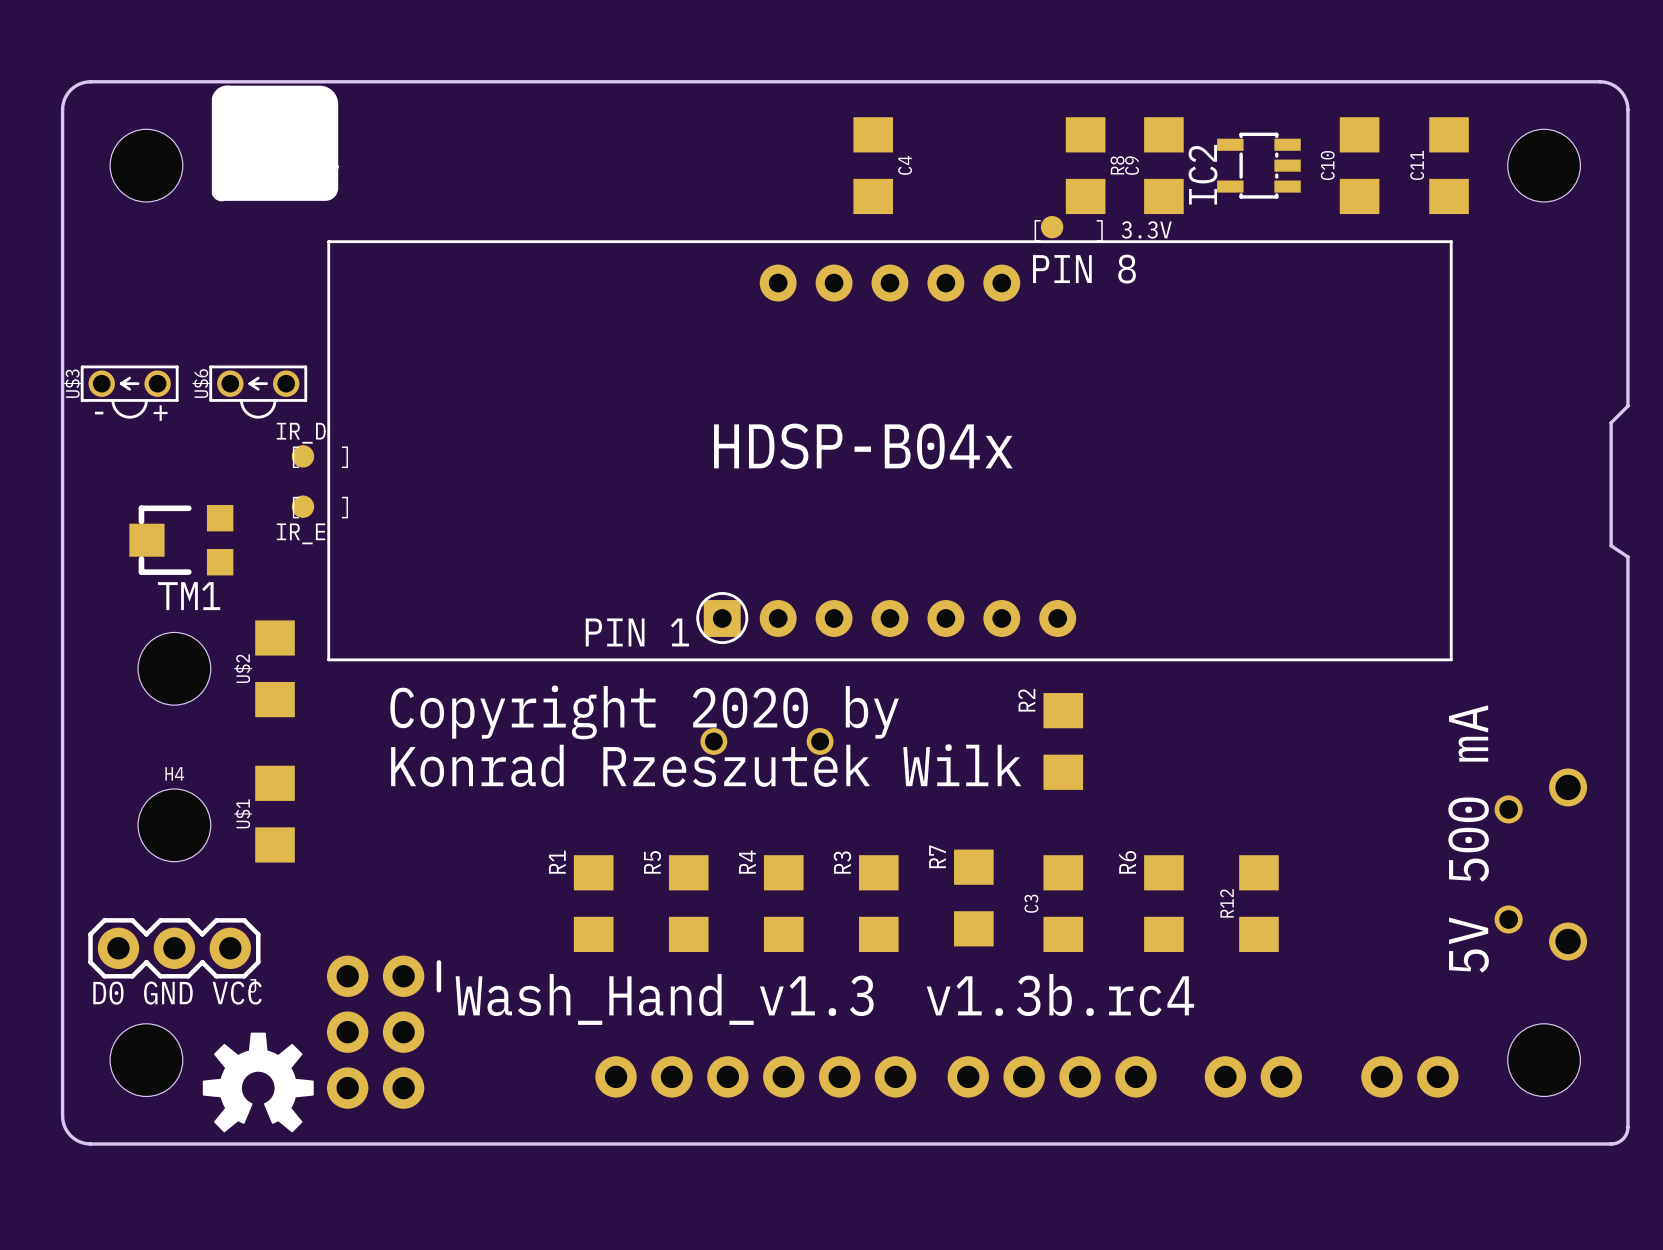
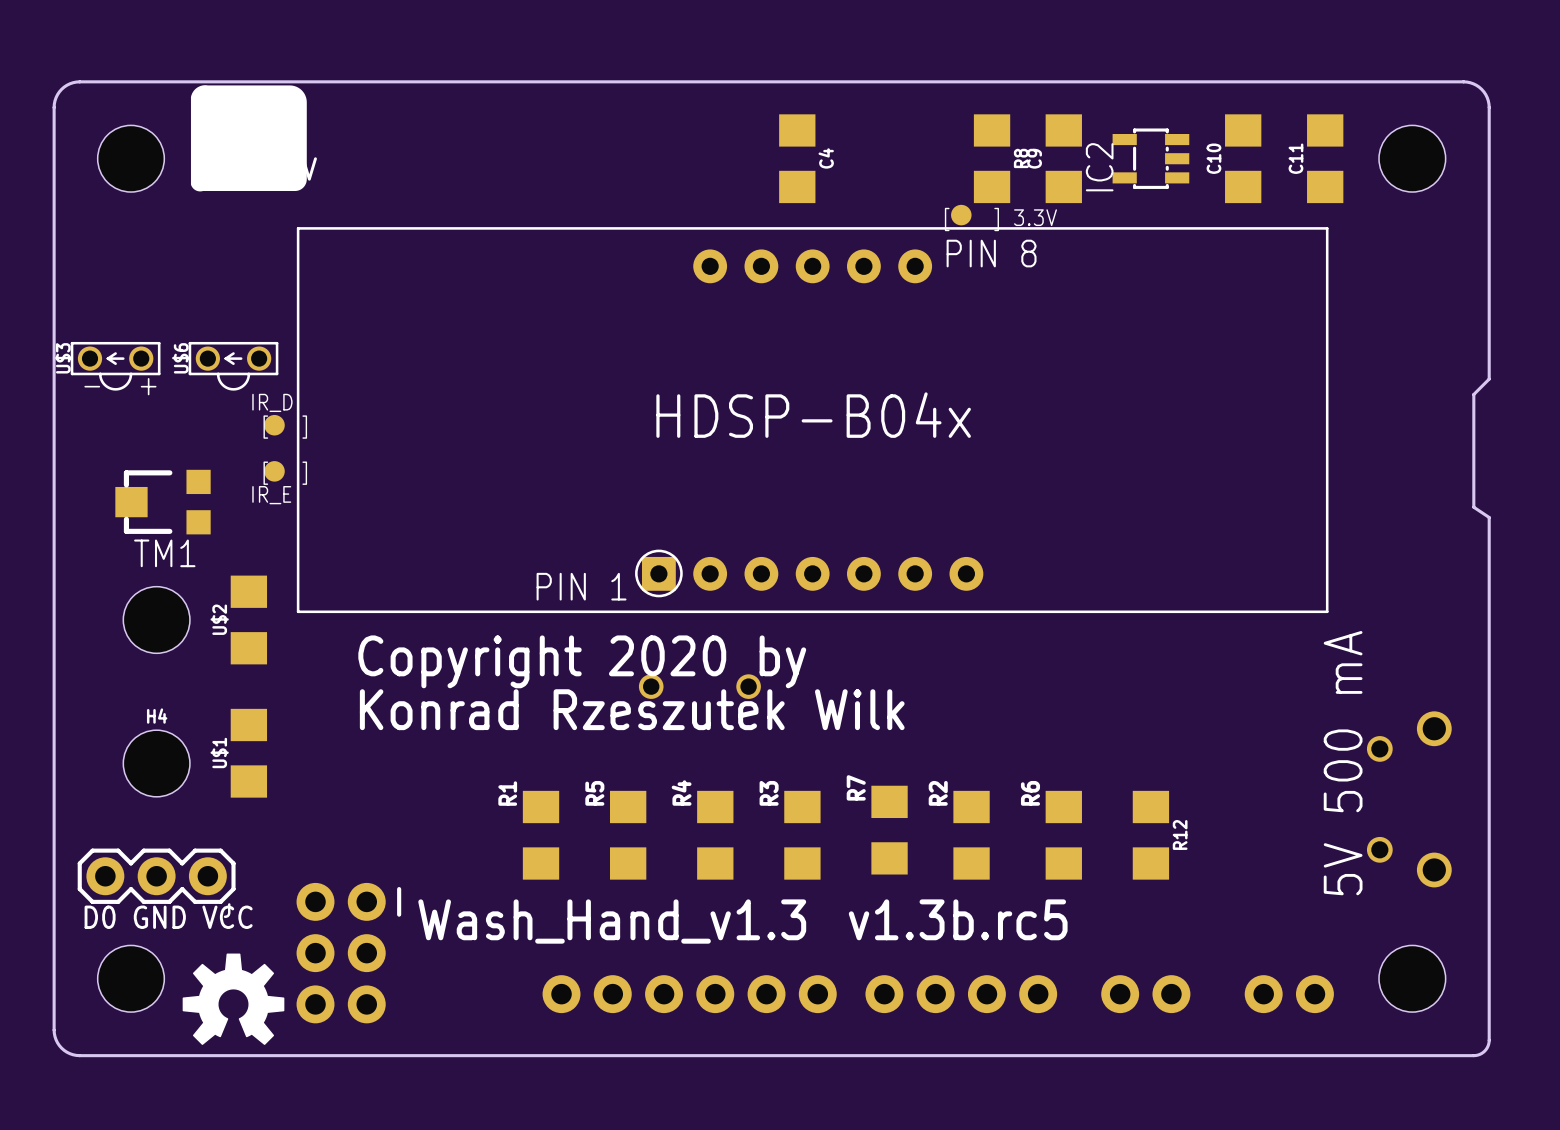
R2: (1063, 741) -> none
C3 name: C3 (1031, 903) -> R2 (938, 793)
R12 name position: R12 (1226, 903) -> R12 (1180, 834)
text: v1.3b.rc4 (1060, 995) -> v1.3b.rc5 (958, 919)

